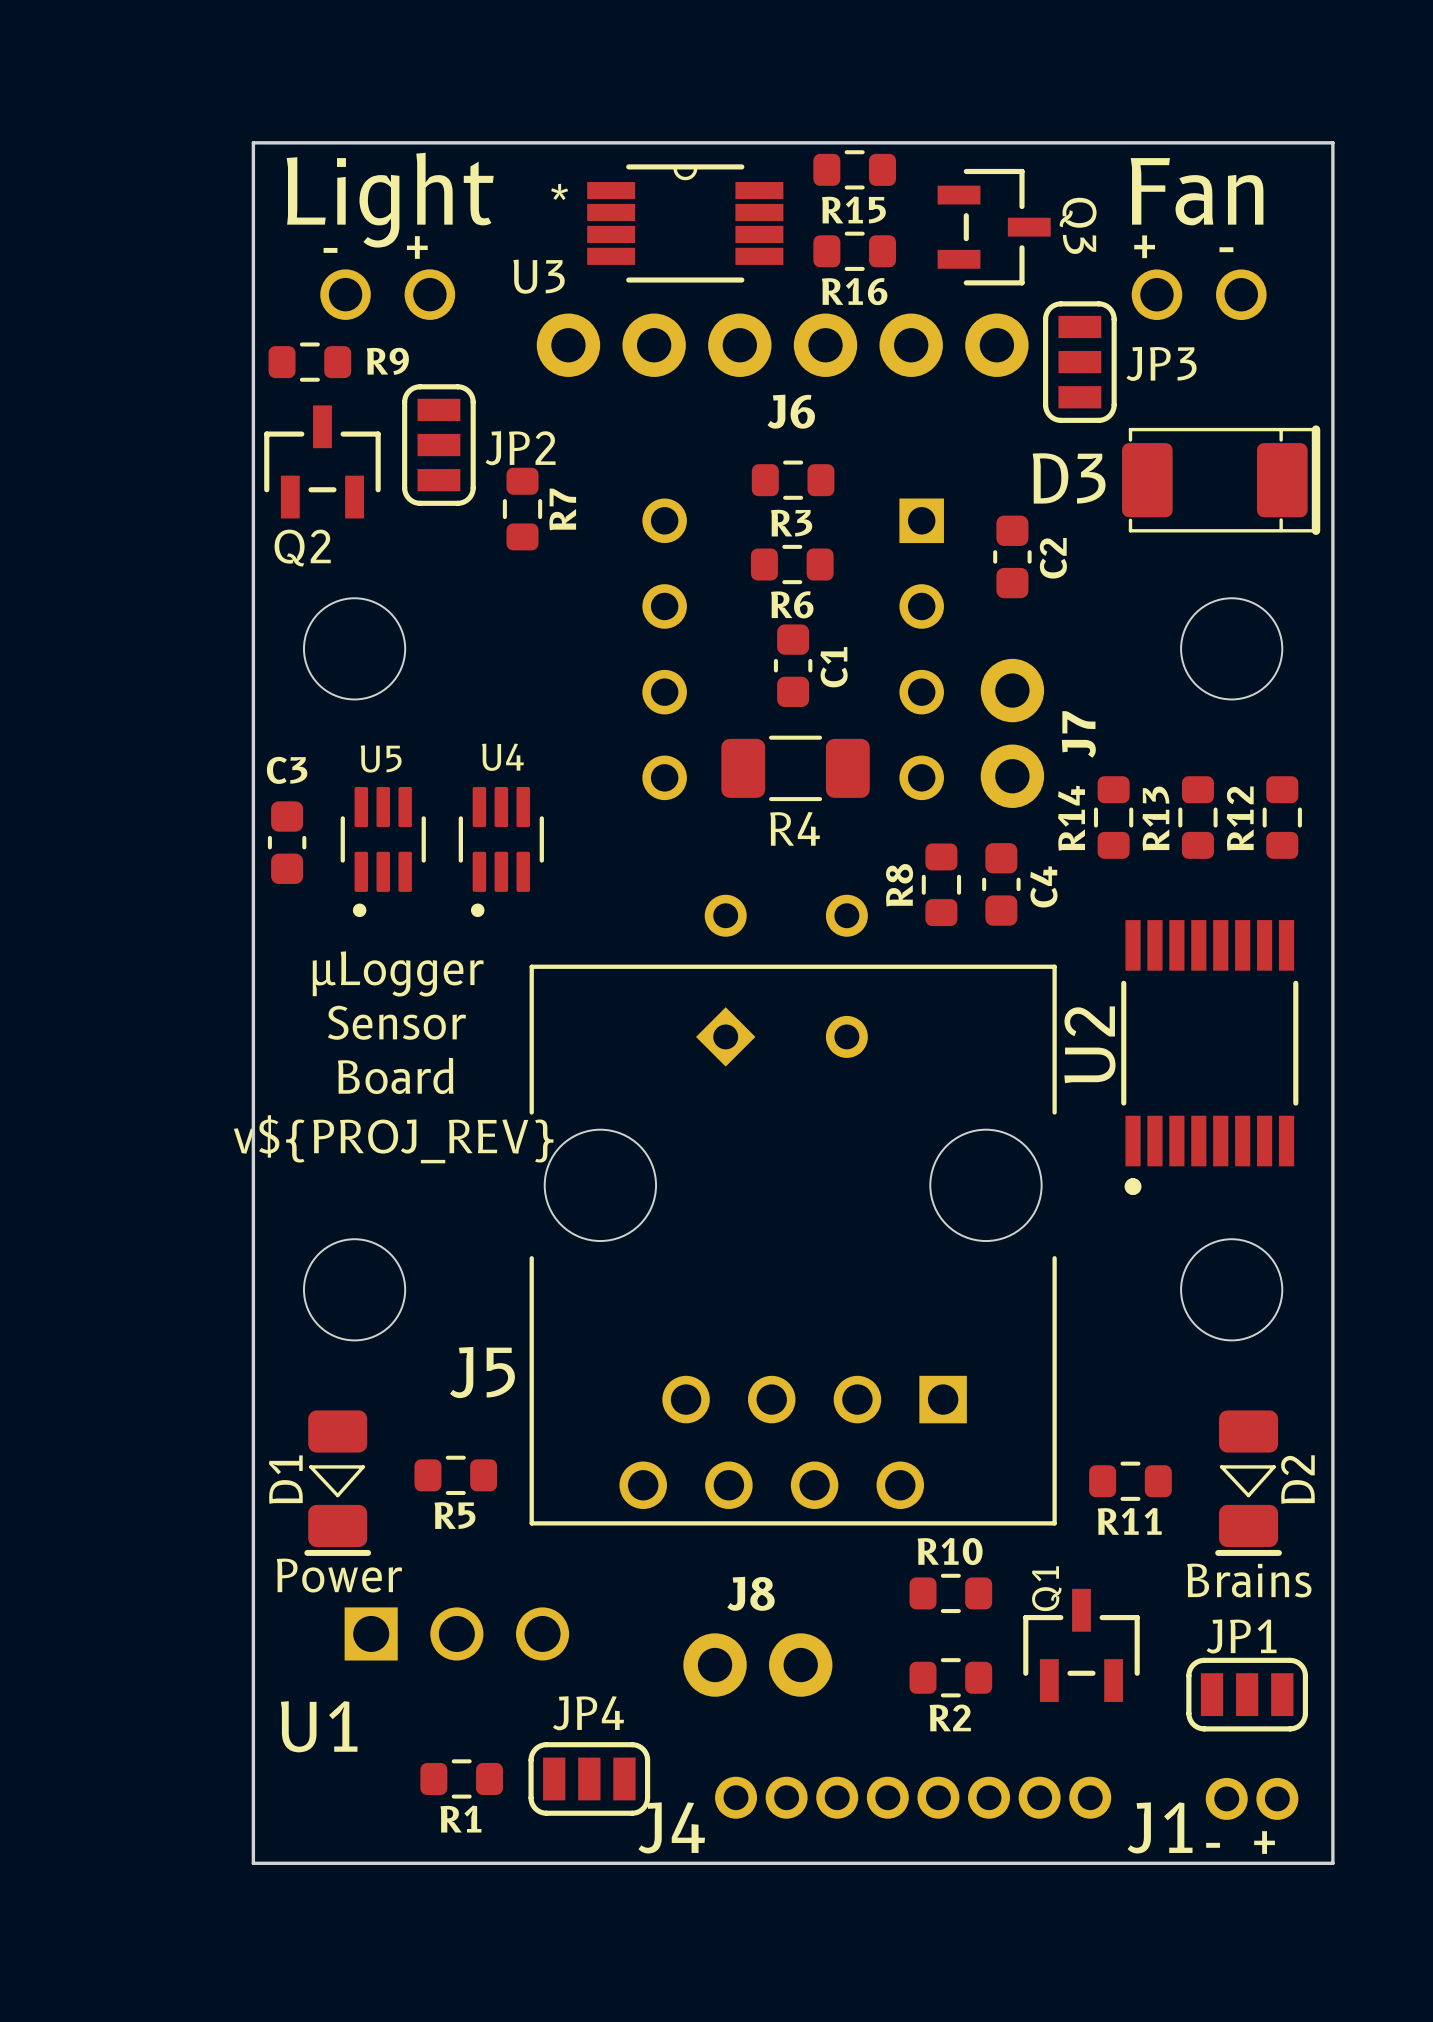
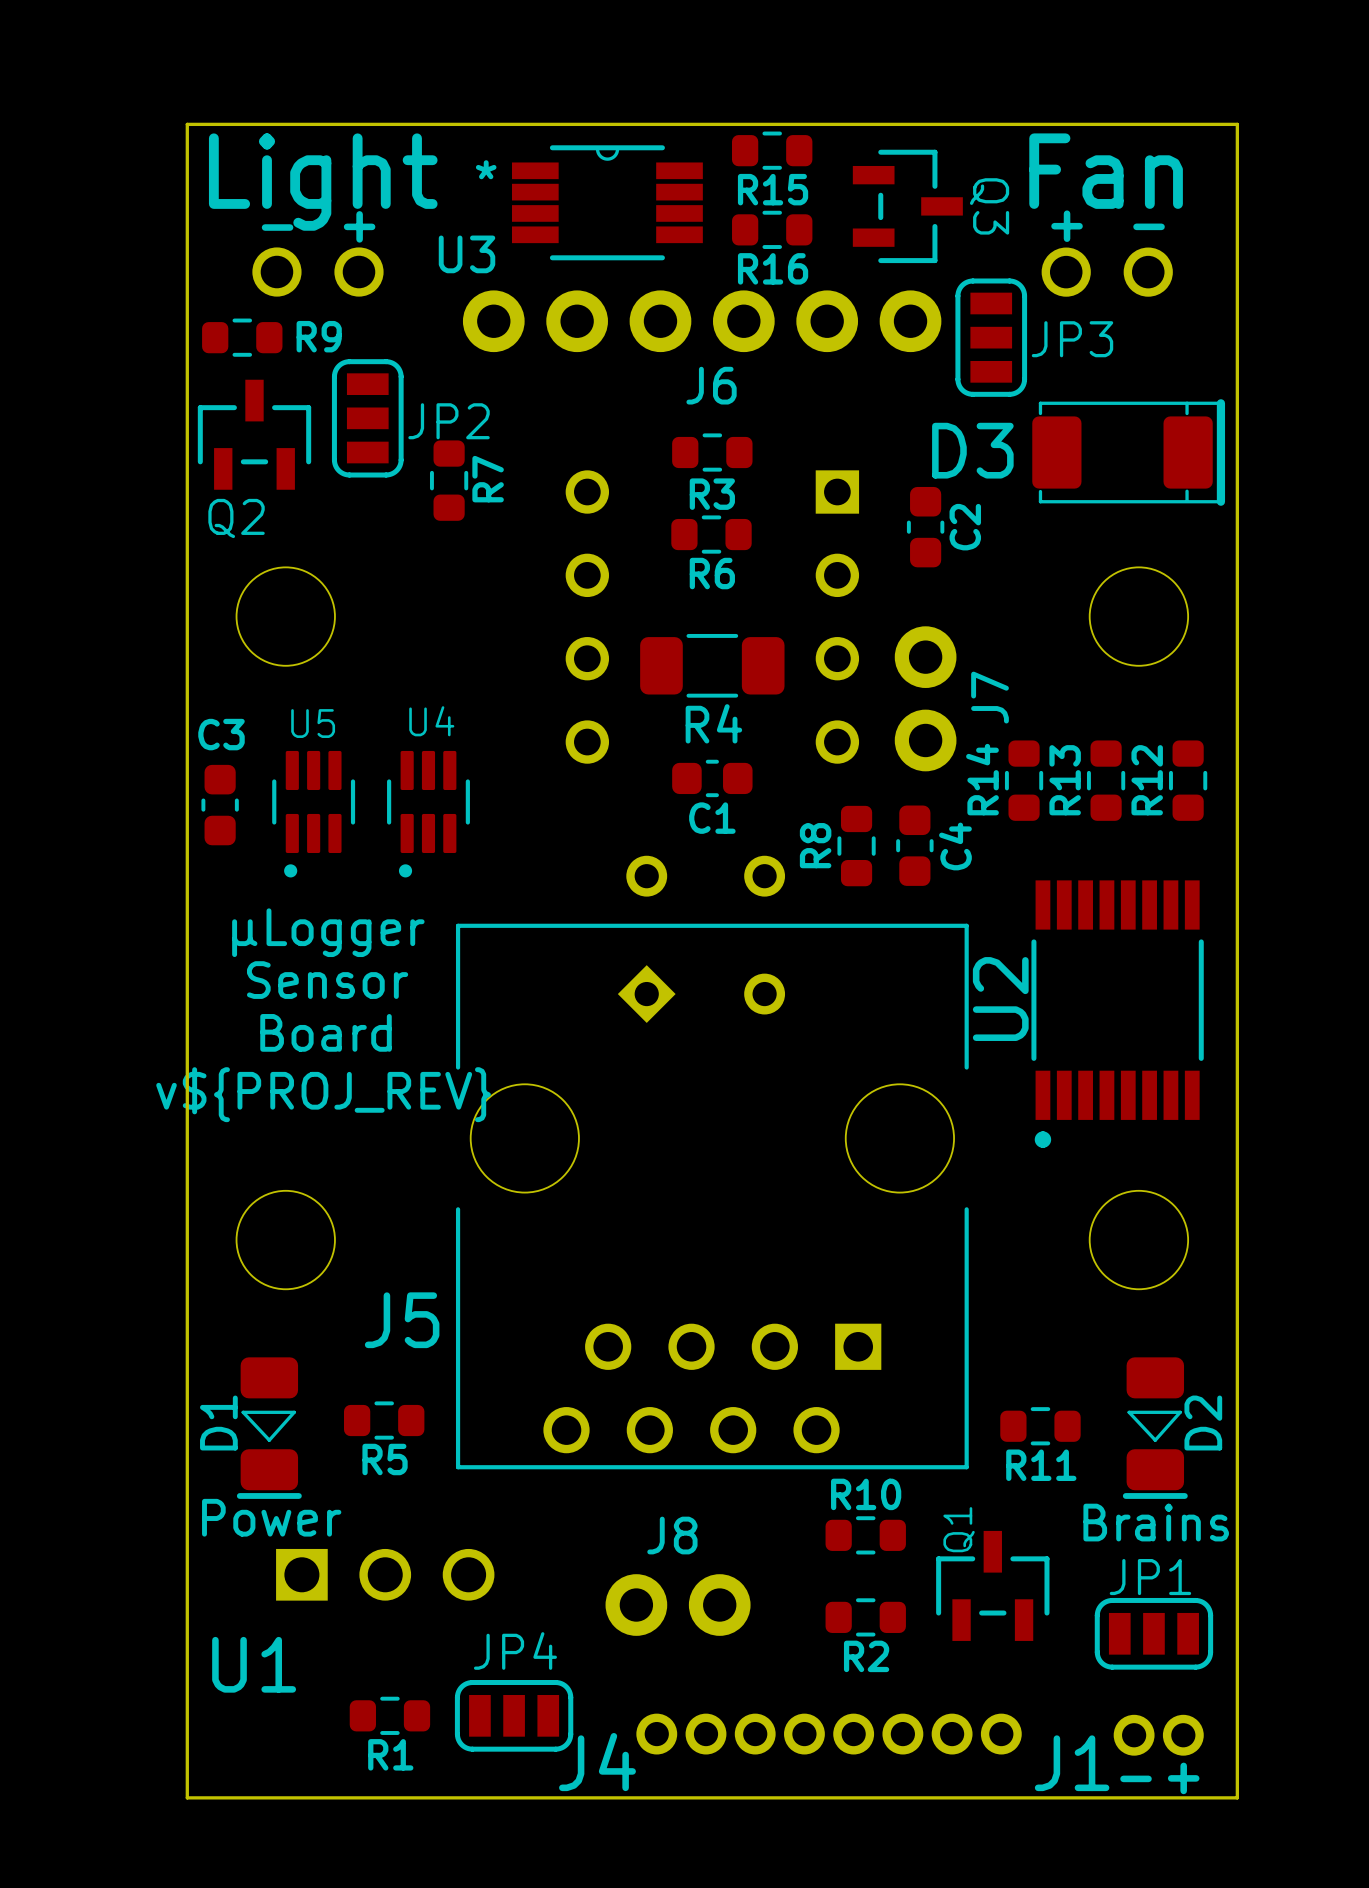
C1 rotation: 0° (793, 665) -> 90° clockwise (712, 778)
C1 position: (793, 665) -> (712, 778)
R4 position: (795, 768) -> (712, 665)

